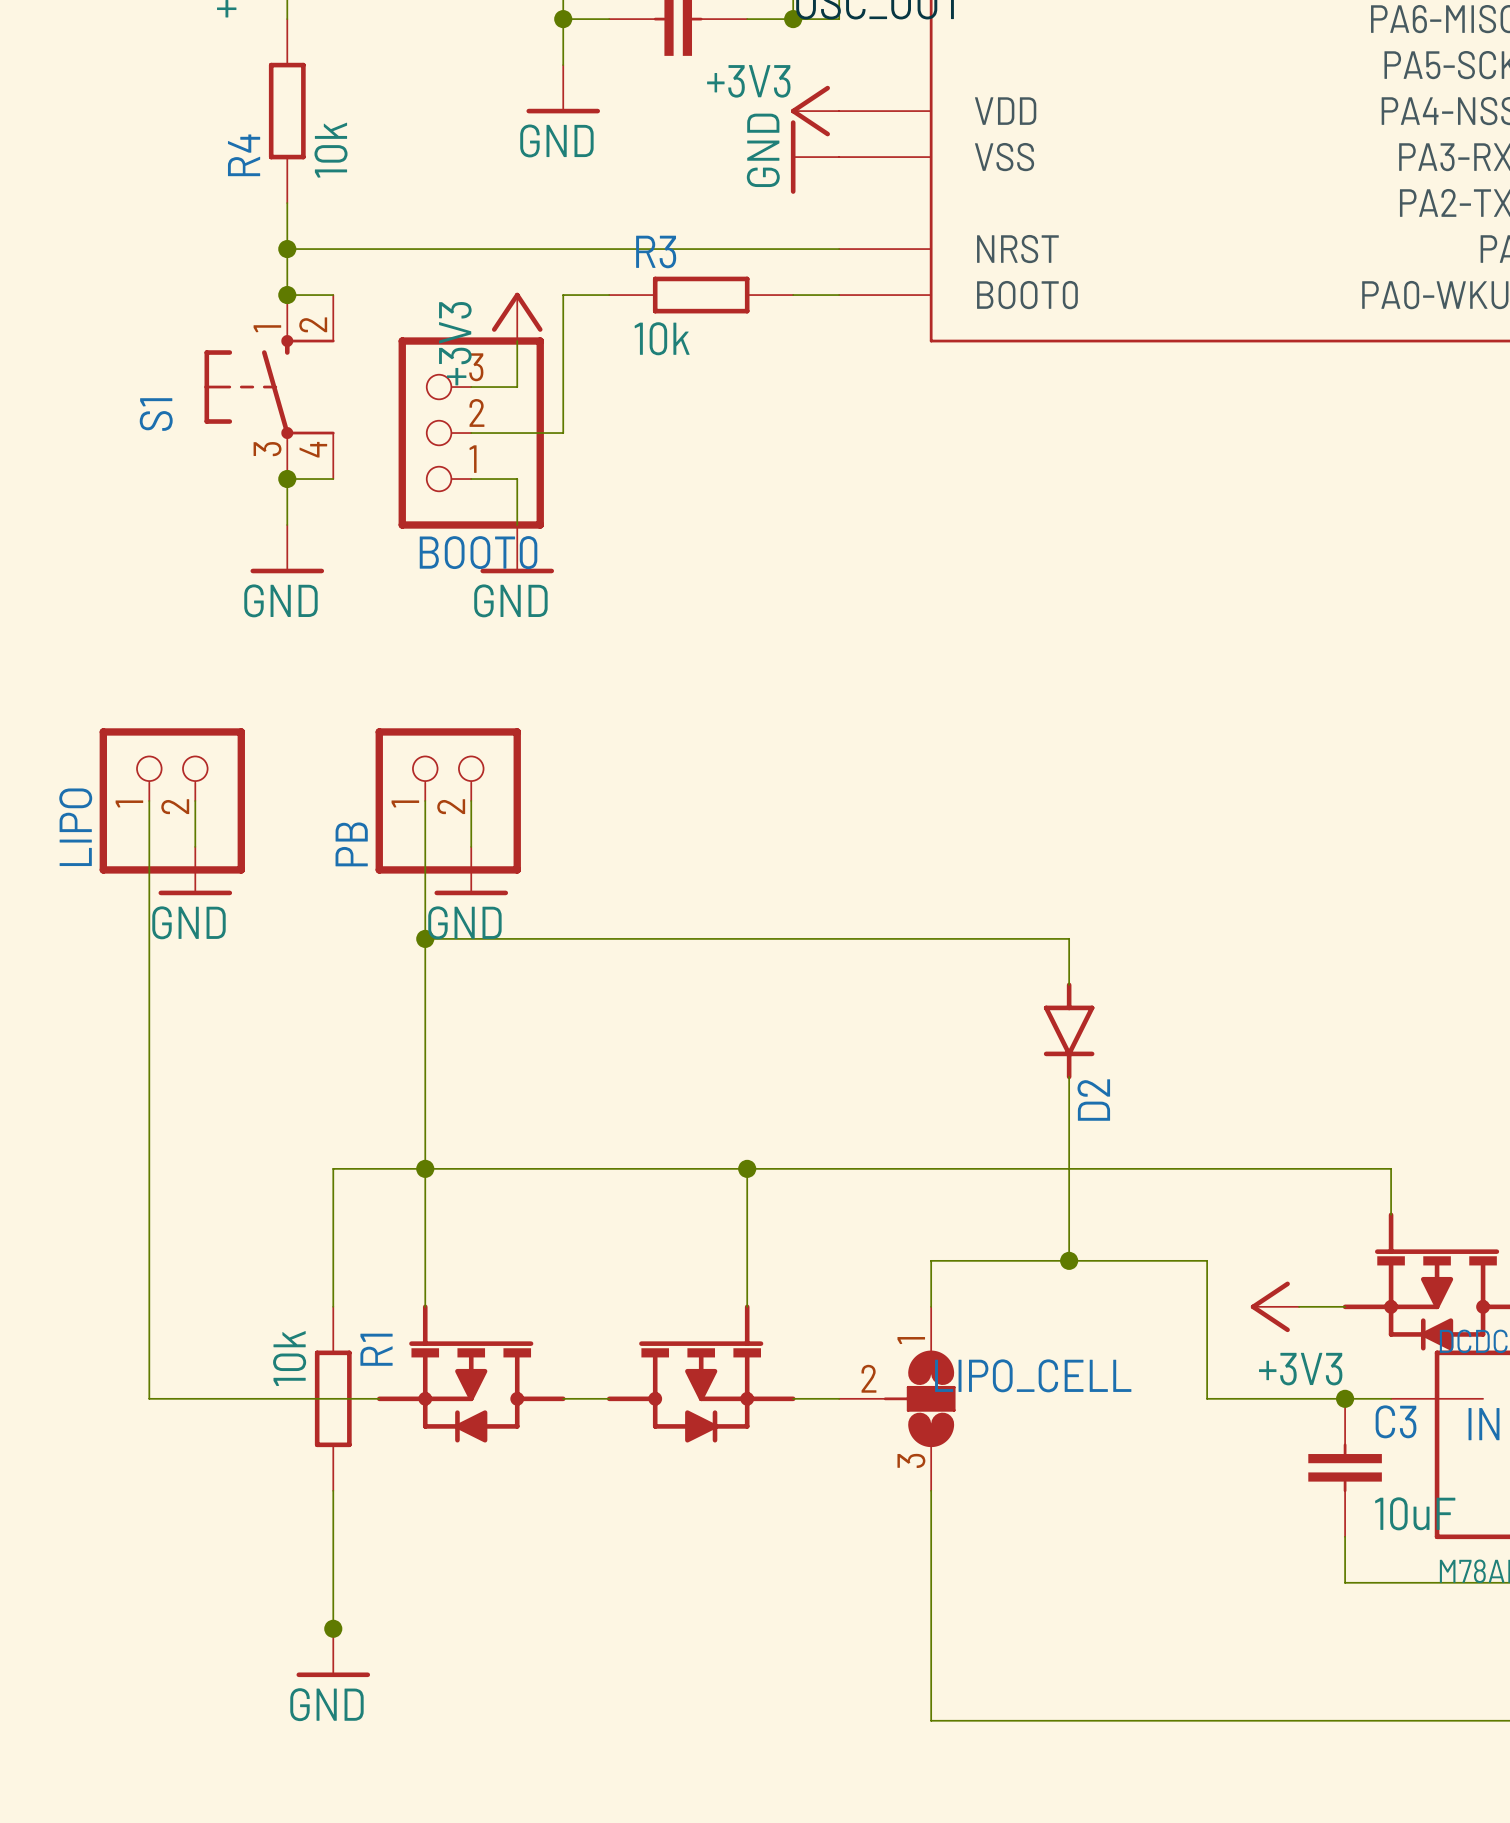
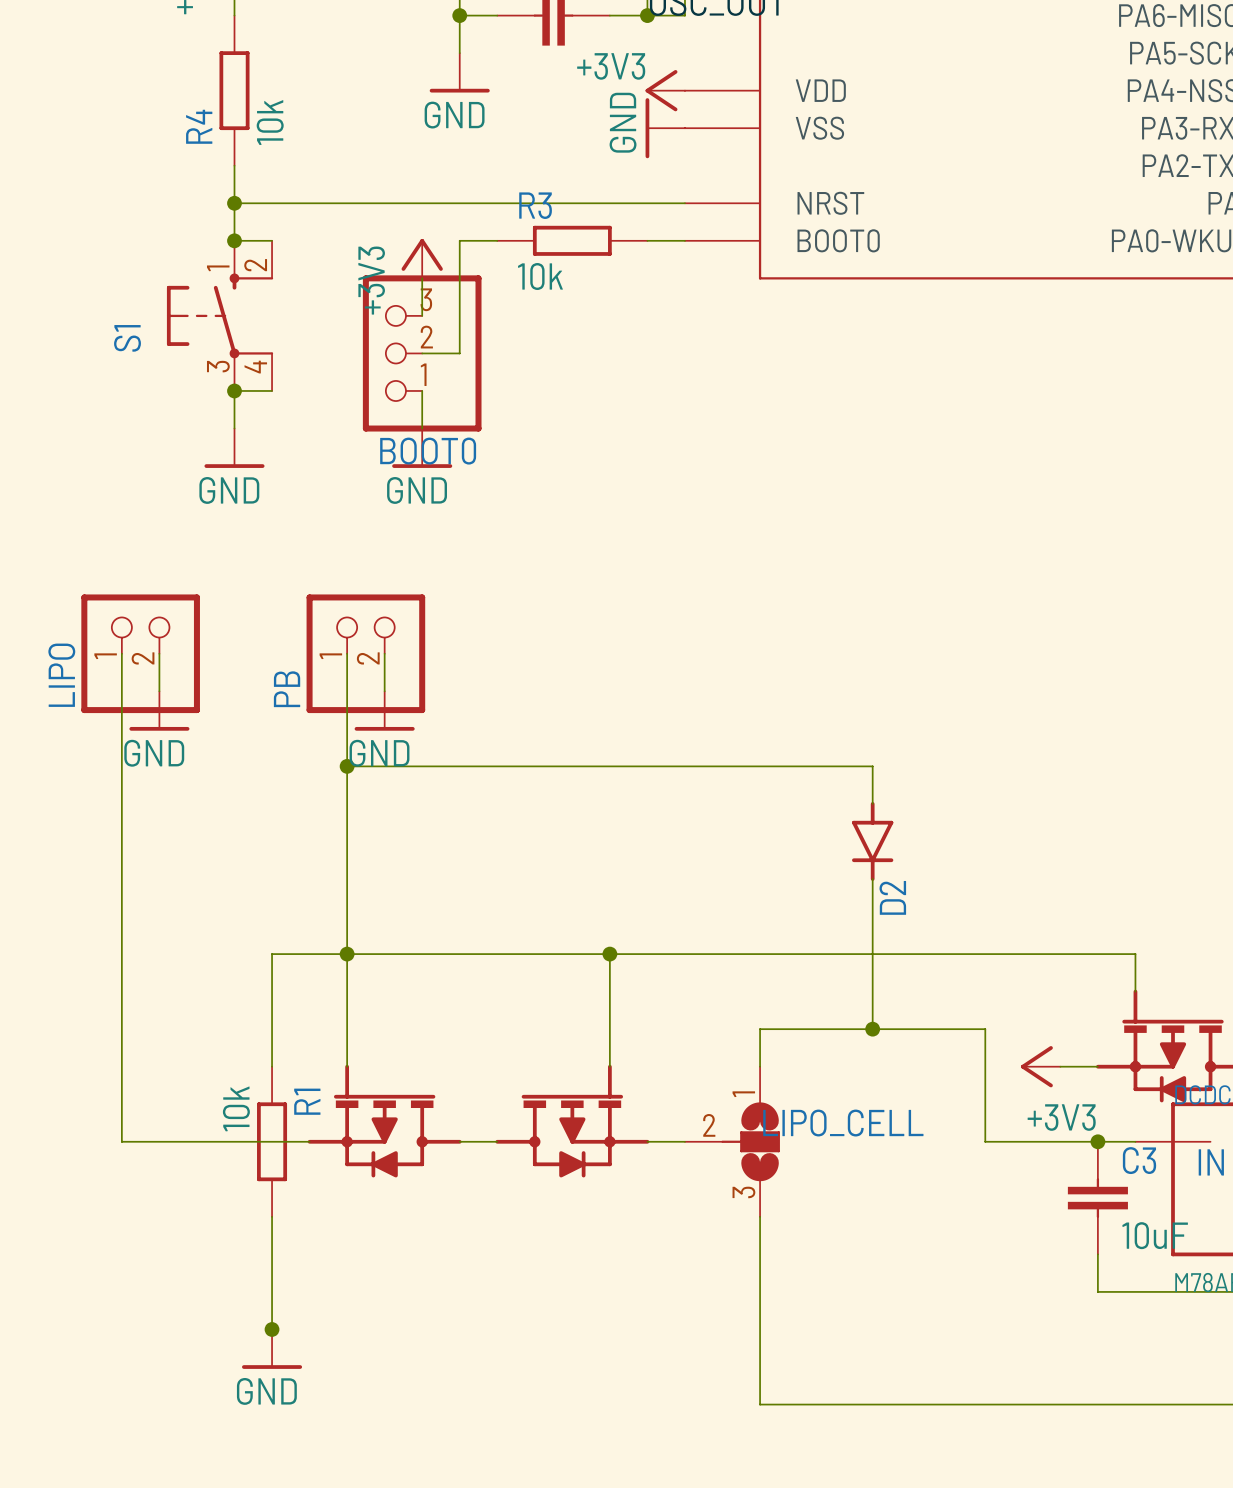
wire: (471, 387) (517, 387) -> none
wire: (471, 433) (517, 433) -> none
BOOT0 position: (471, 433) -> (422, 353)
wire: (471, 479) (517, 479) -> none

